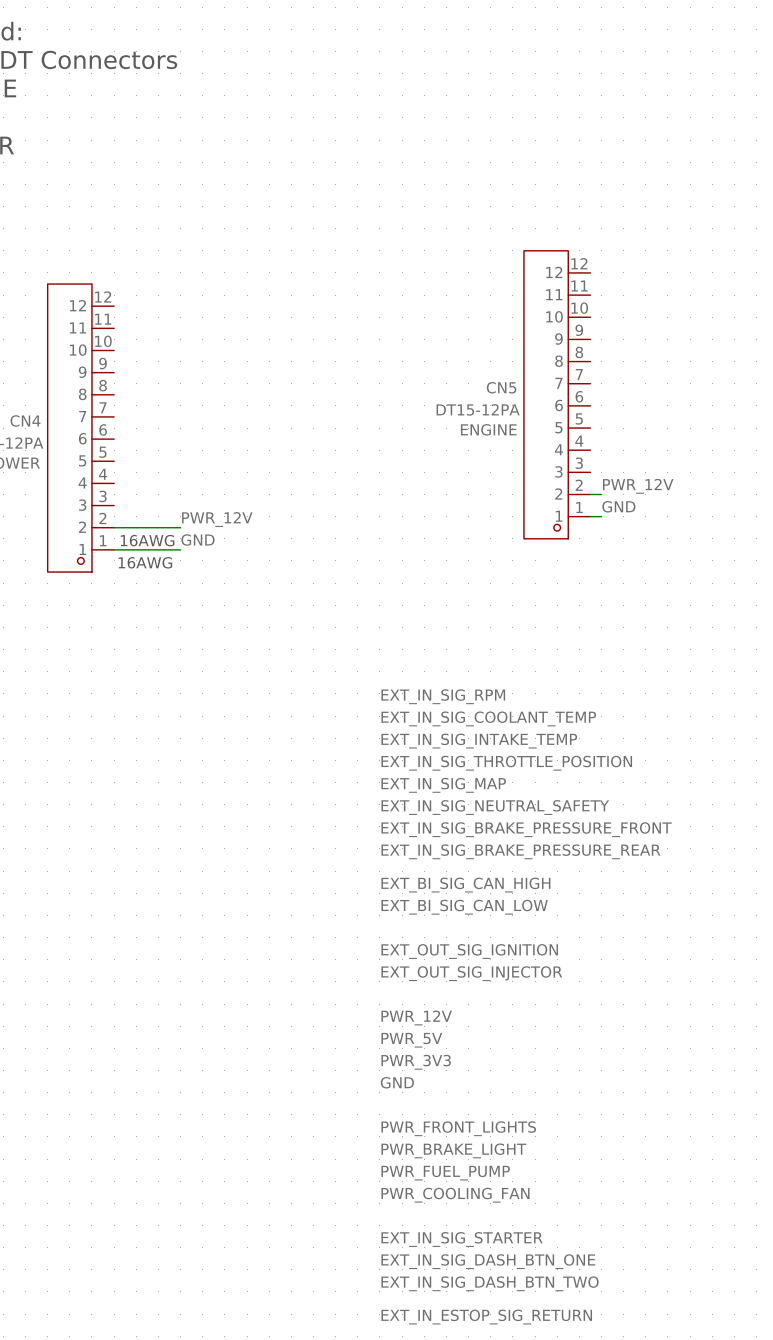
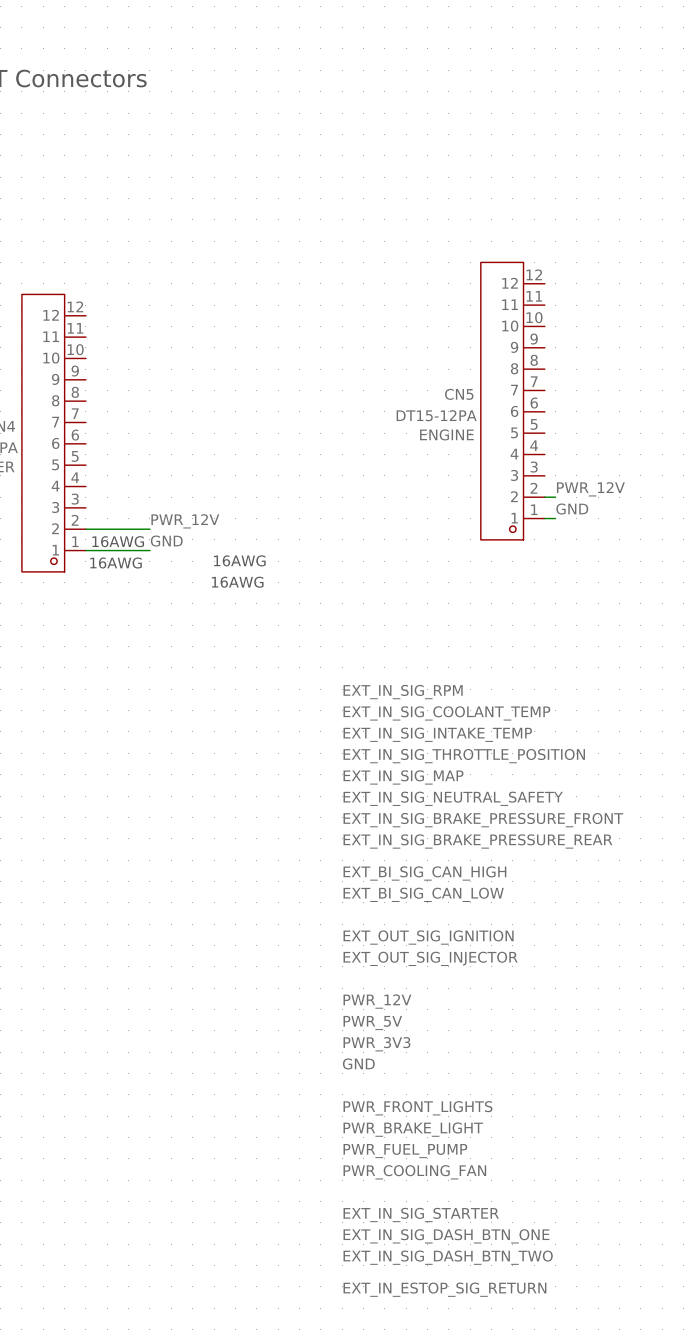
text: none -> 16AWG (239, 560)
text: none -> 16AWG (237, 582)

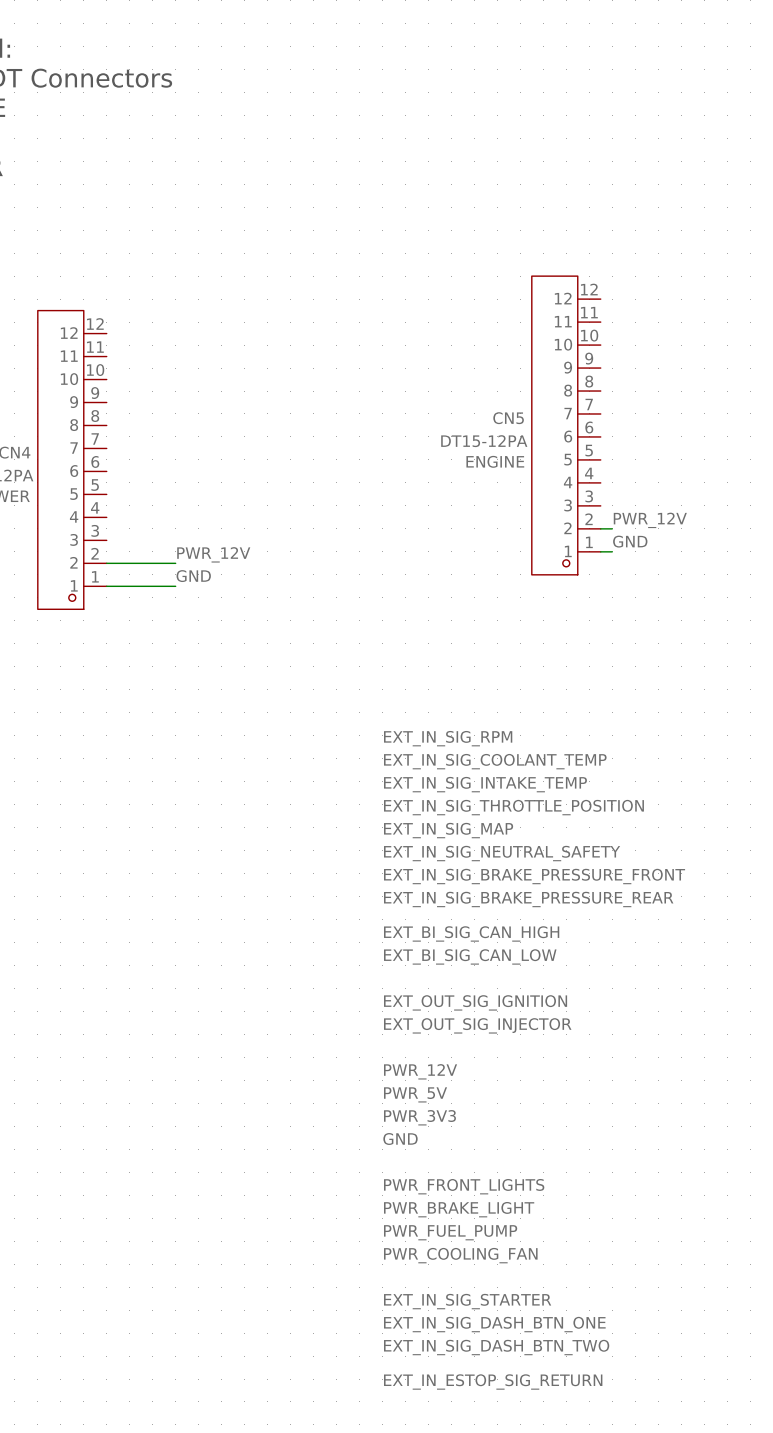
text: 16AWG (118, 541) -> none
text: 16AWG (239, 560) -> none
text: 16AWG (116, 563) -> none
text: 16AWG (237, 582) -> none

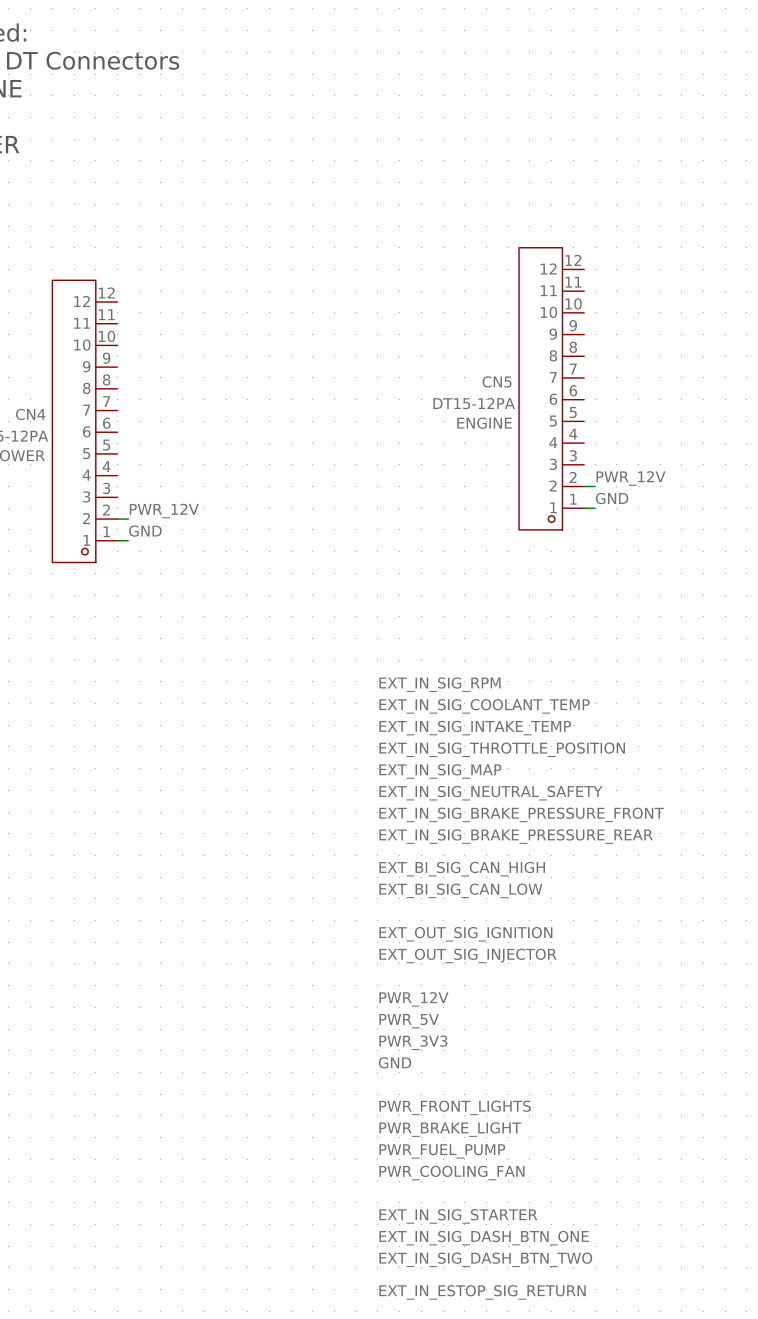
label position: PWR_12V (213, 554) -> PWR_12V (164, 511)
wire: (118, 563) (175, 563) -> none
label position: GND (193, 576) -> GND (145, 531)
wire: (118, 586) (175, 586) -> none

